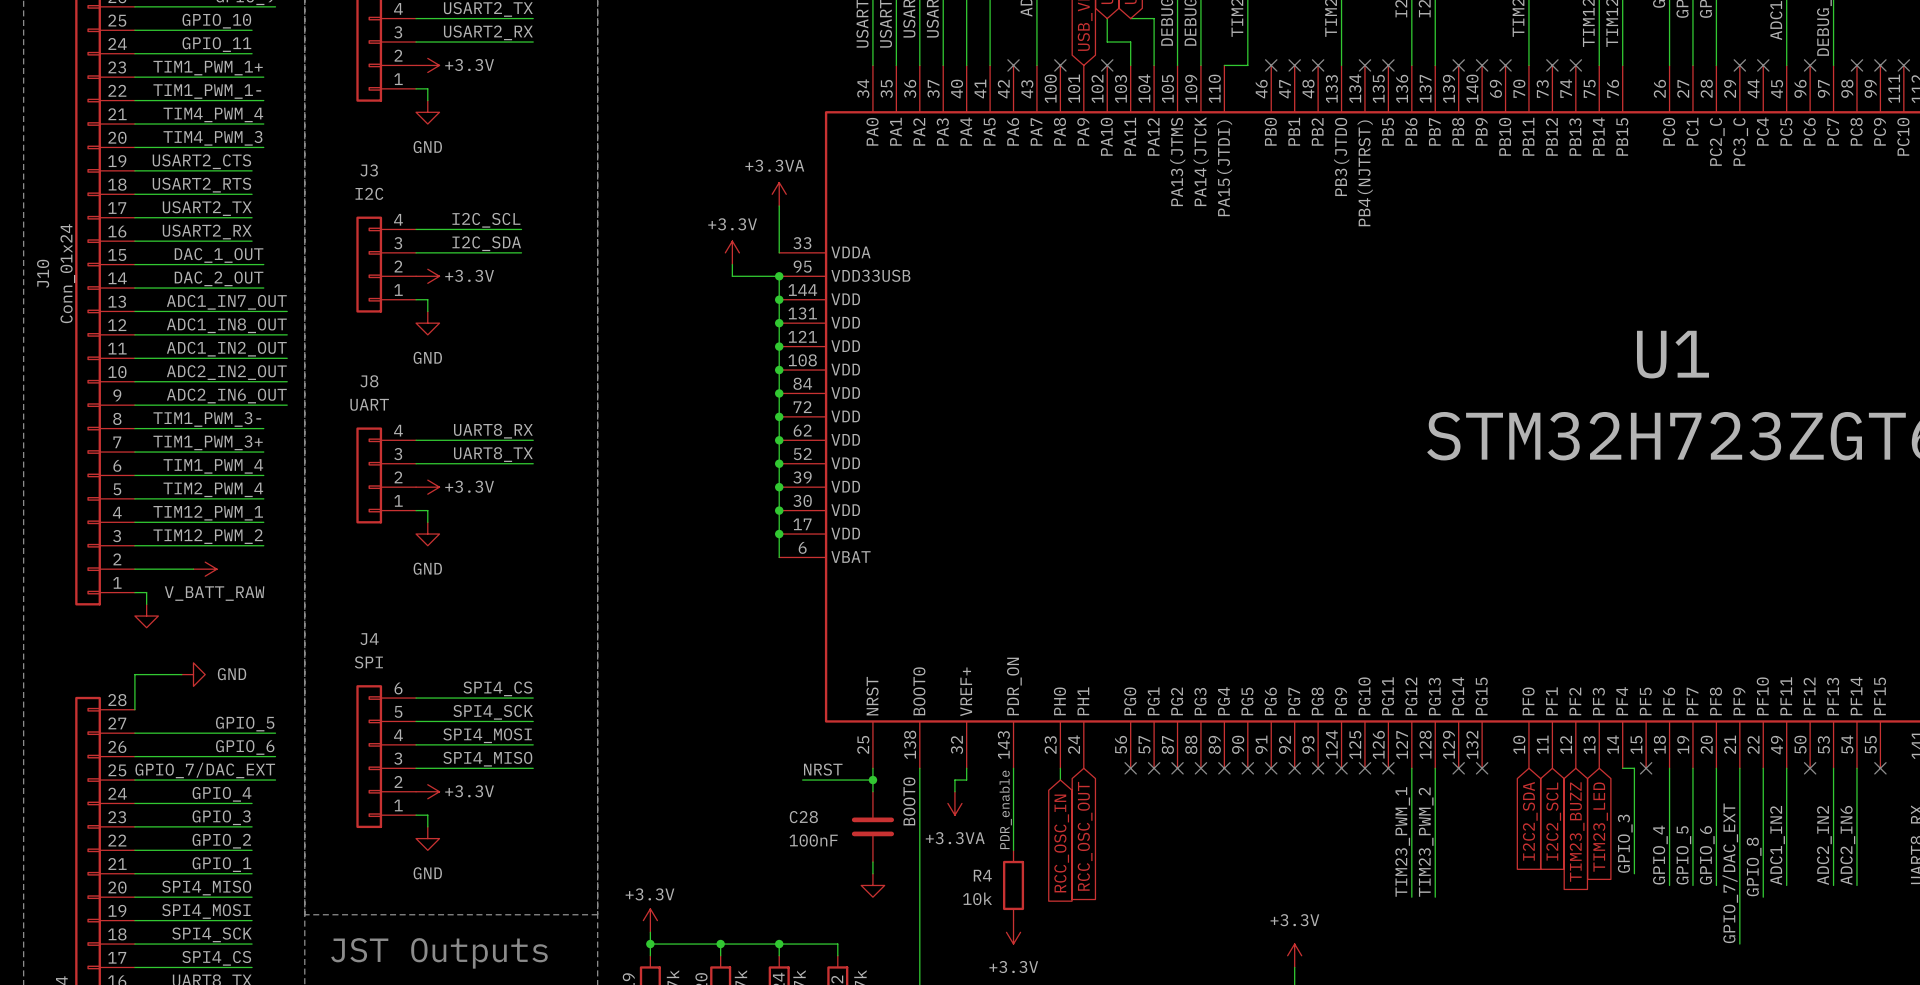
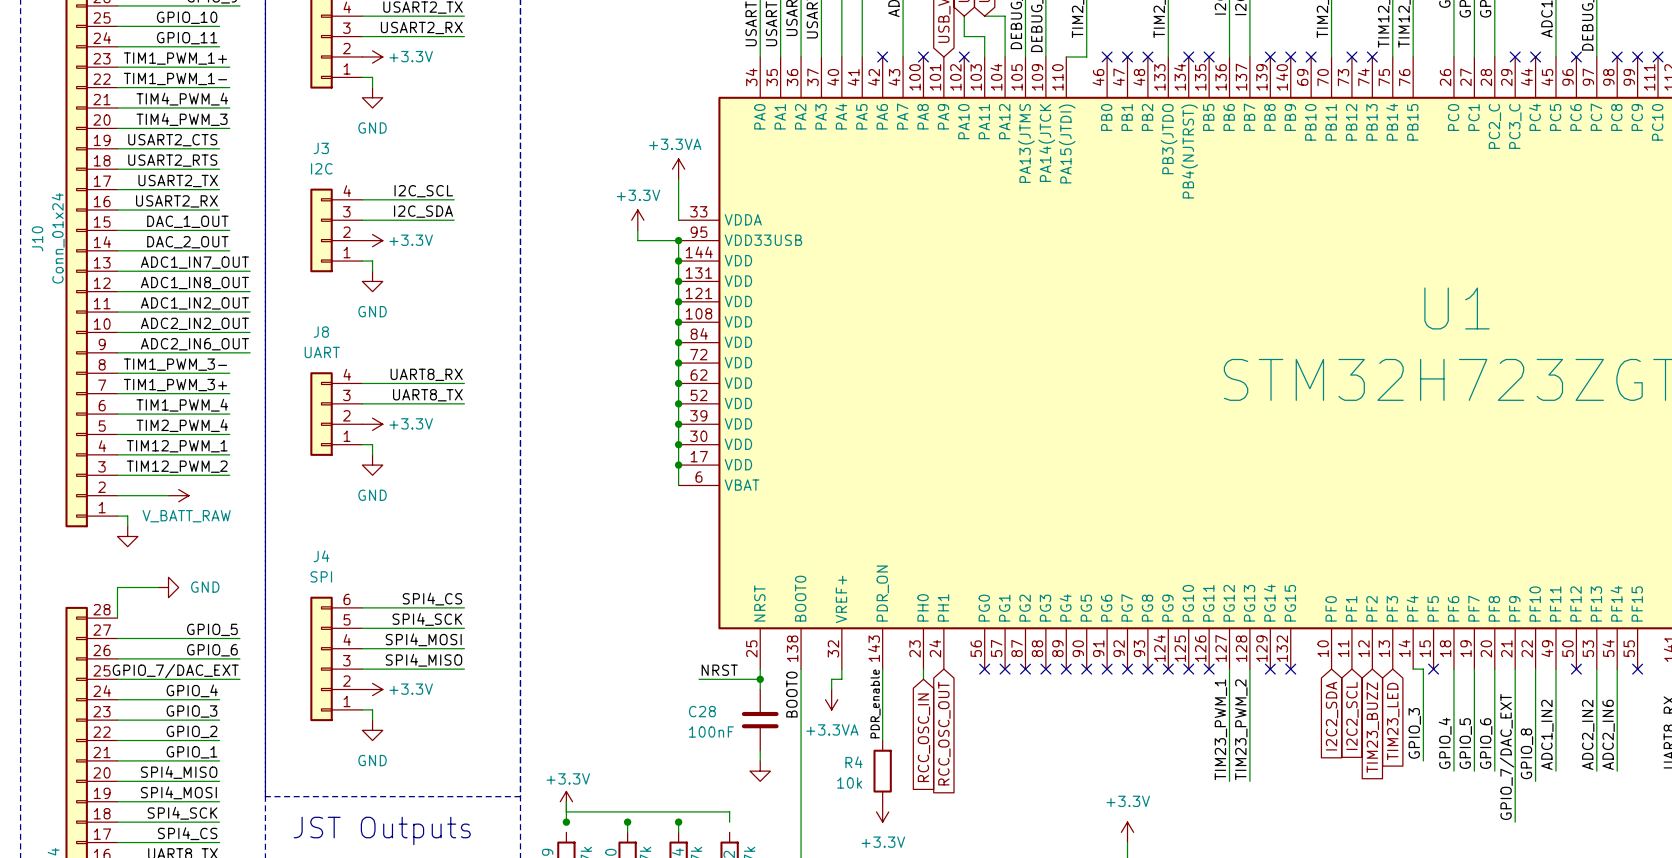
wire: none -> (566, 801) (566, 811) (729, 811) (729, 822)
wire: (650, 955) (650, 944) (837, 944) (837, 955) -> none

